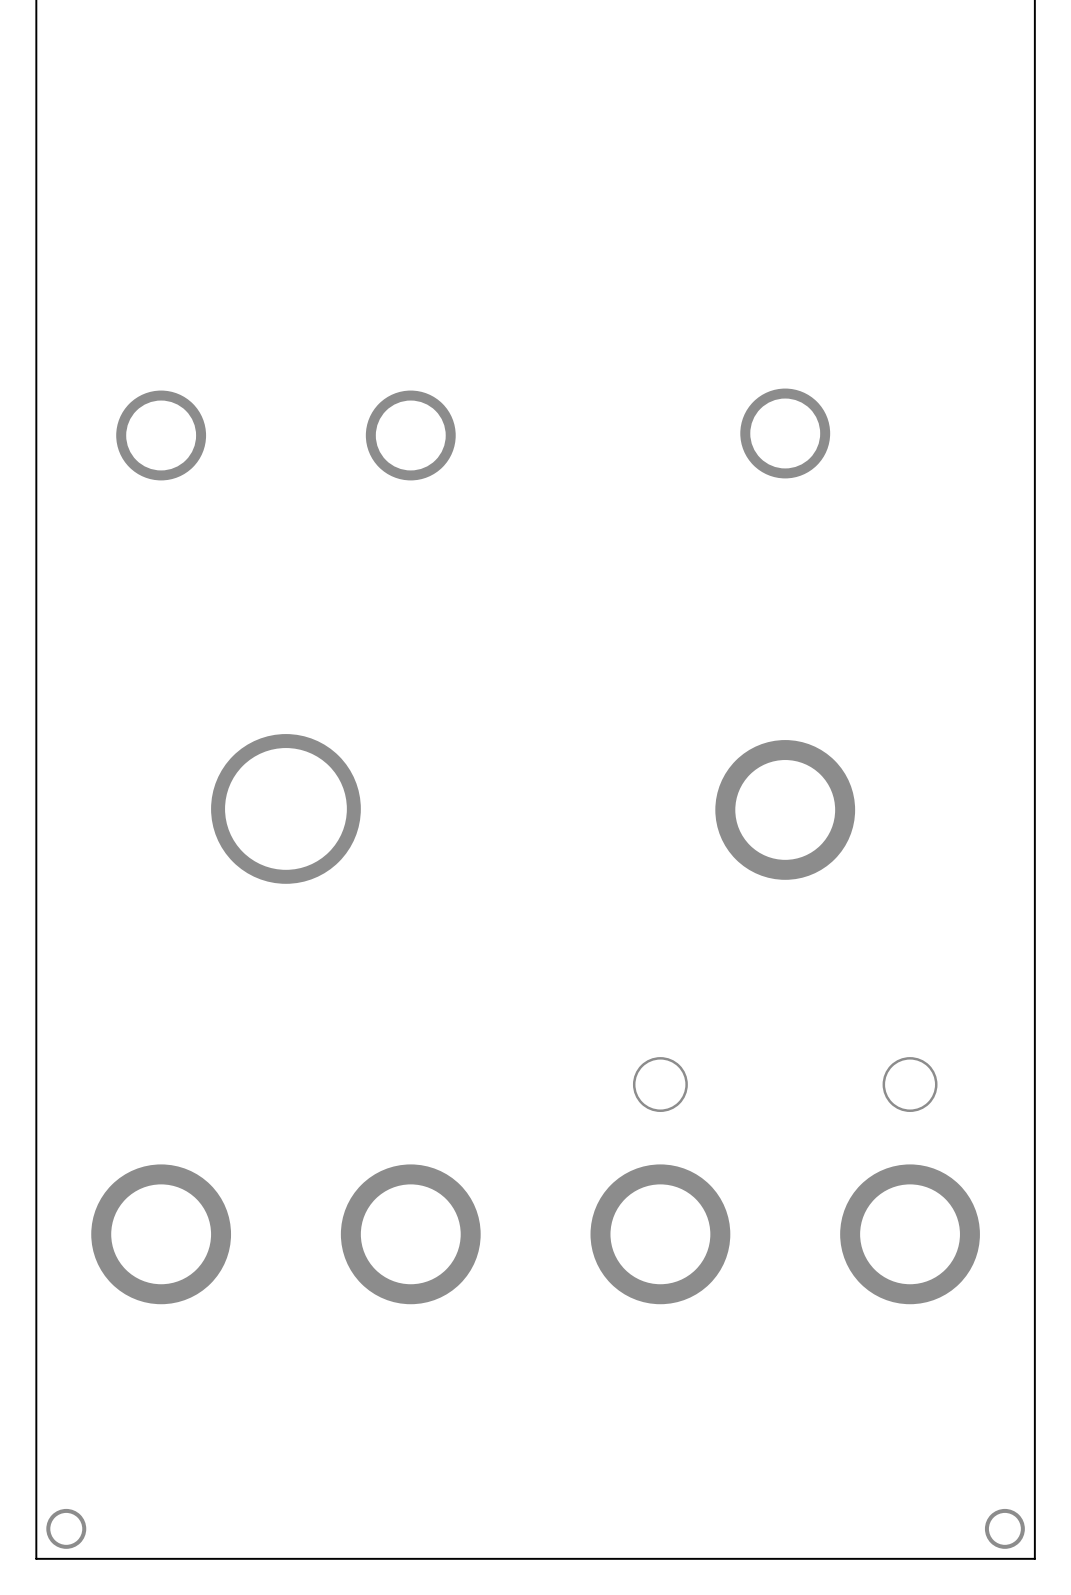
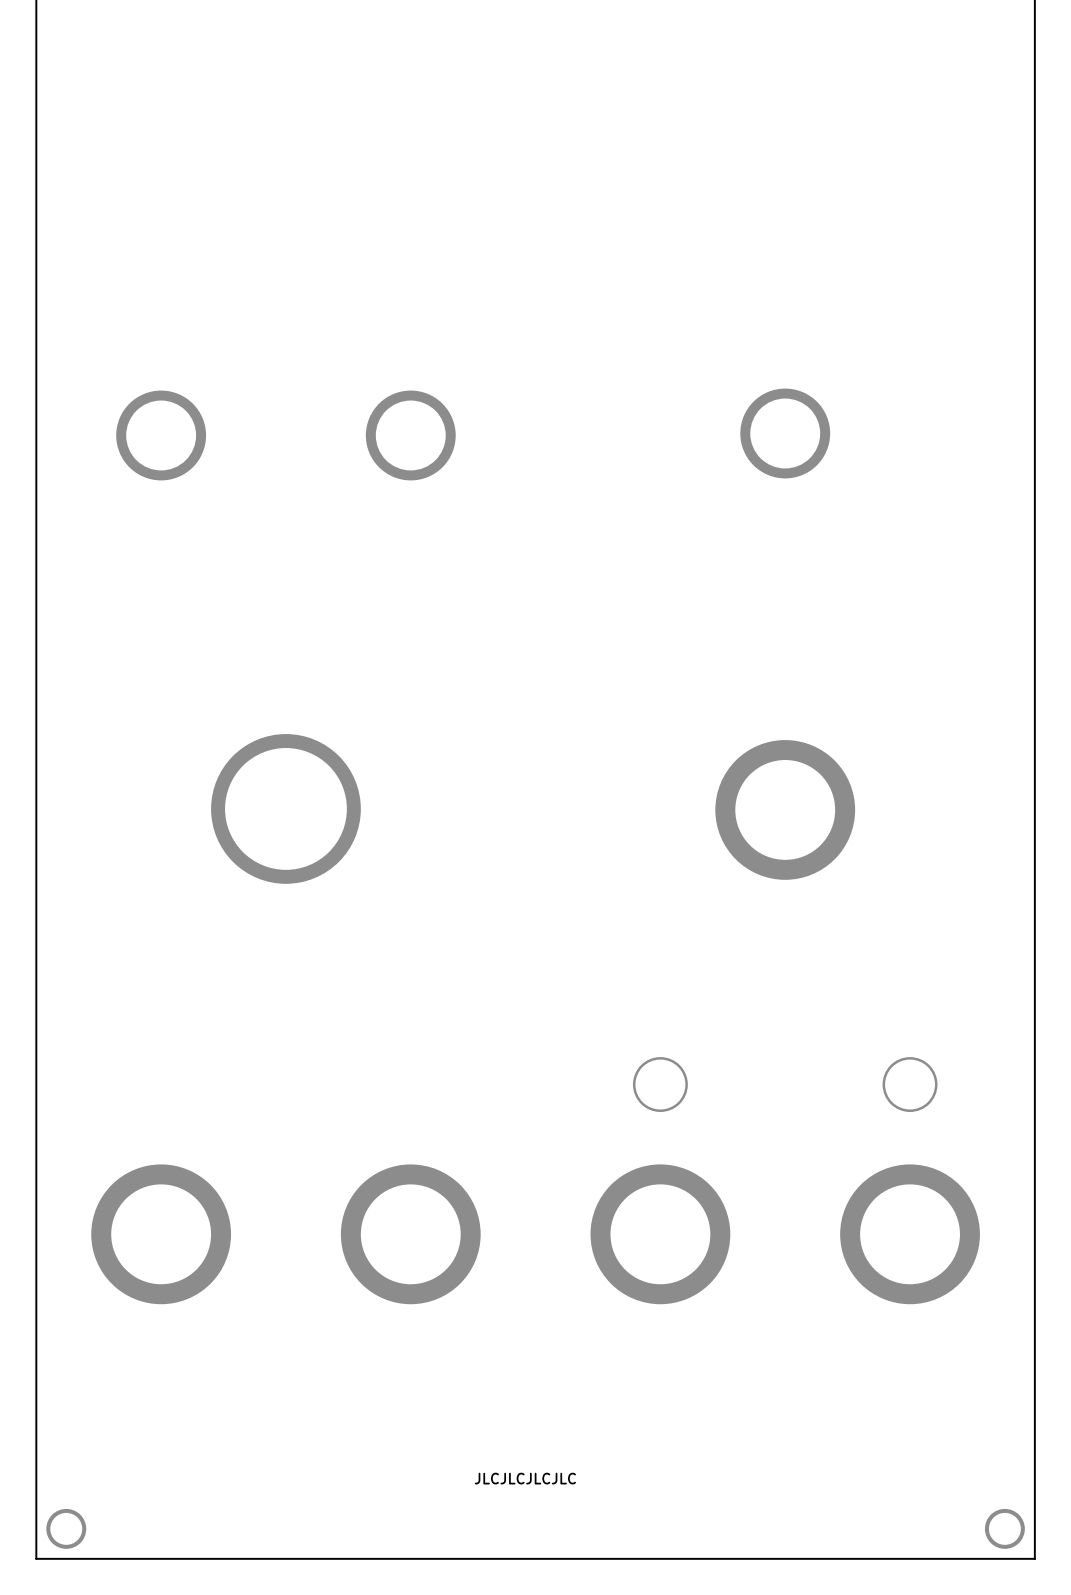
text: none -> JLCJLCJLCJLC (525, 1478)

